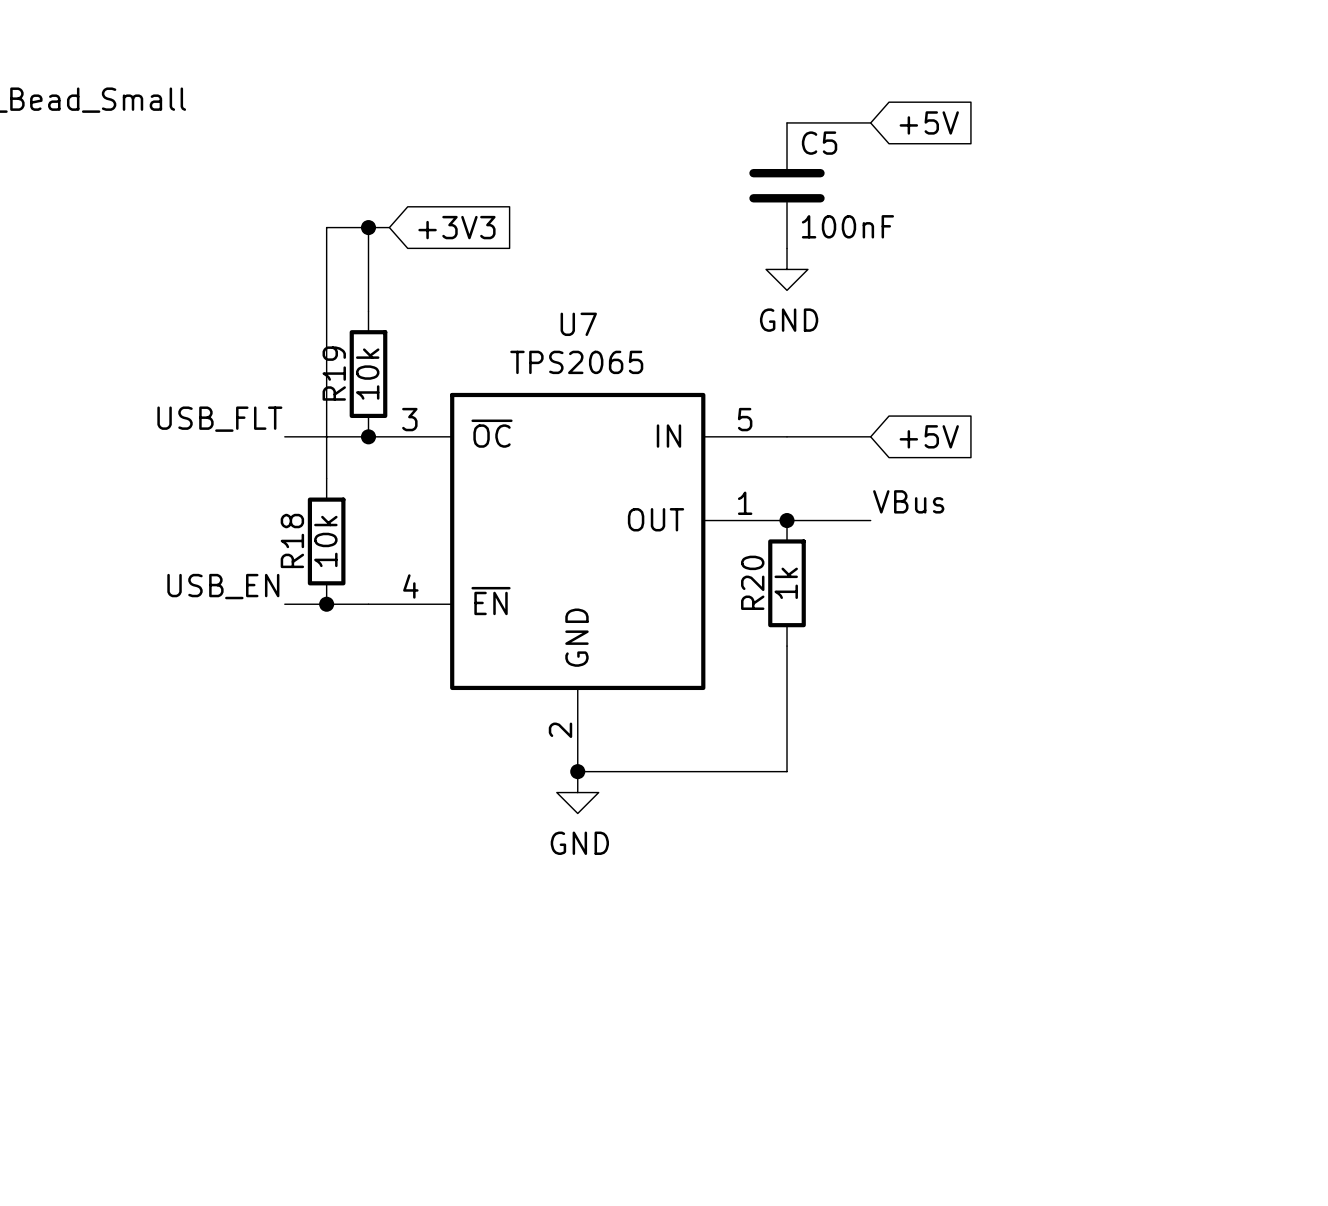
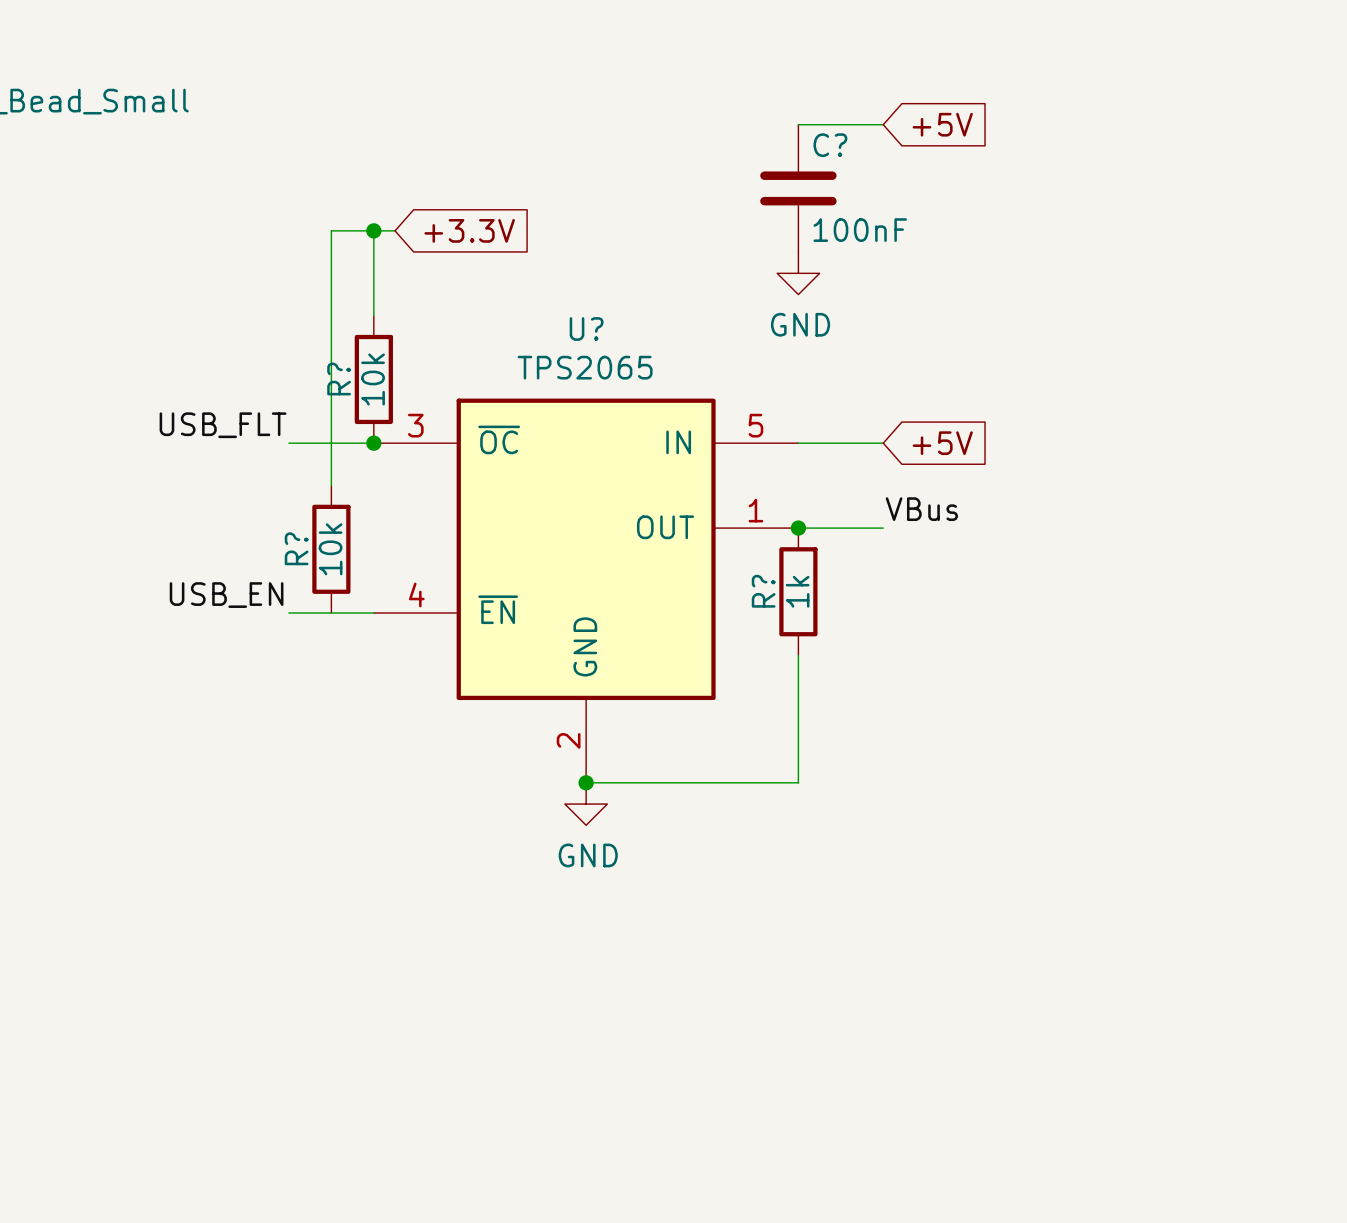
C5 name: C5 (819, 143) -> C? (830, 145)
global label: +3V3 (456, 227) -> +3.3V (469, 230)
U7 name: U7 (578, 324) -> U? (586, 329)
R19 name: R19 (334, 373) -> R? (339, 378)
R18 name: R18 (292, 540) -> R? (296, 548)
R20 name: R20 (752, 582) -> R? (763, 591)
junction: (326, 604) -> none

